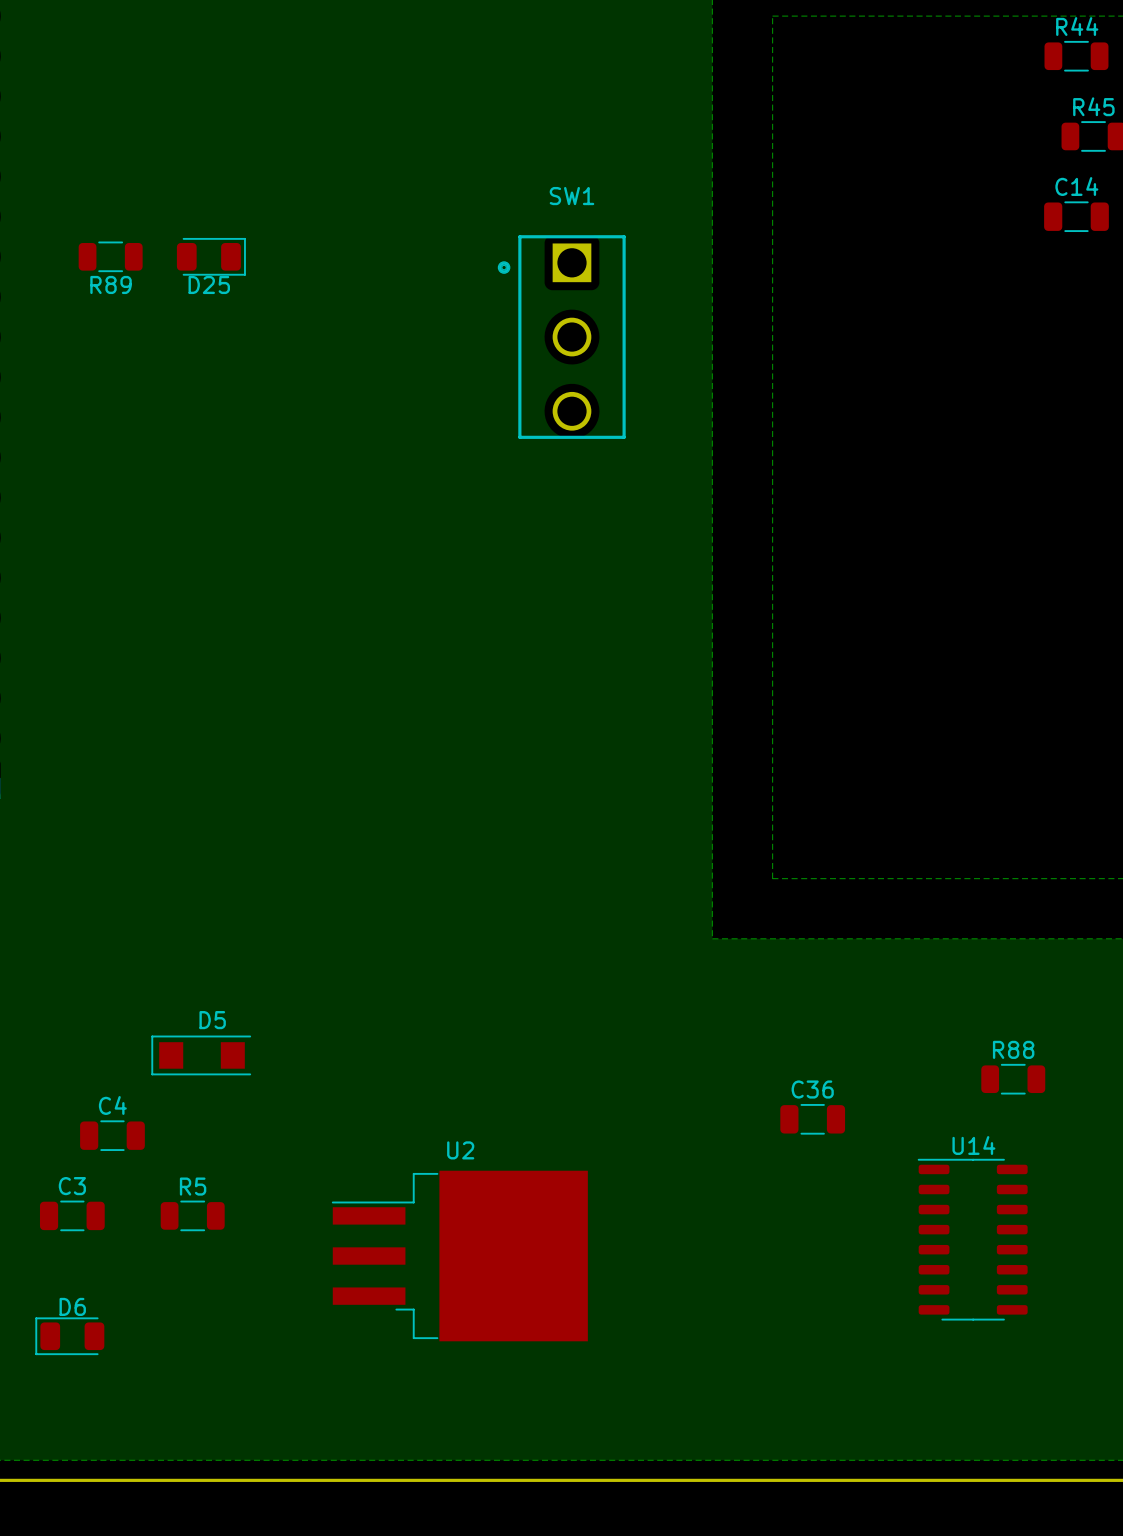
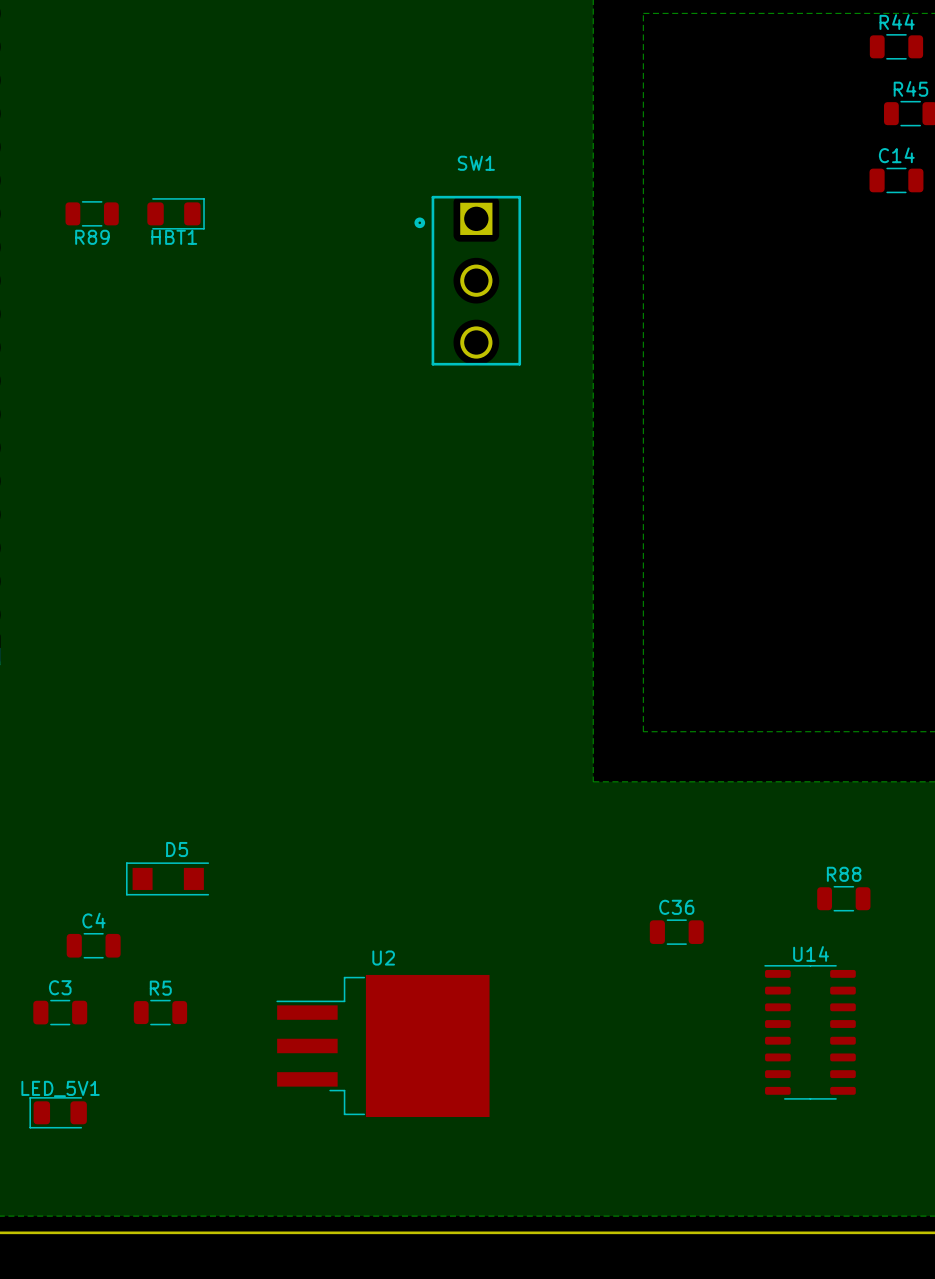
D25 name: D25 (209, 284) -> HBT1 (174, 237)
D6 name: D6 (72, 1306) -> LED_5V1 (60, 1088)

